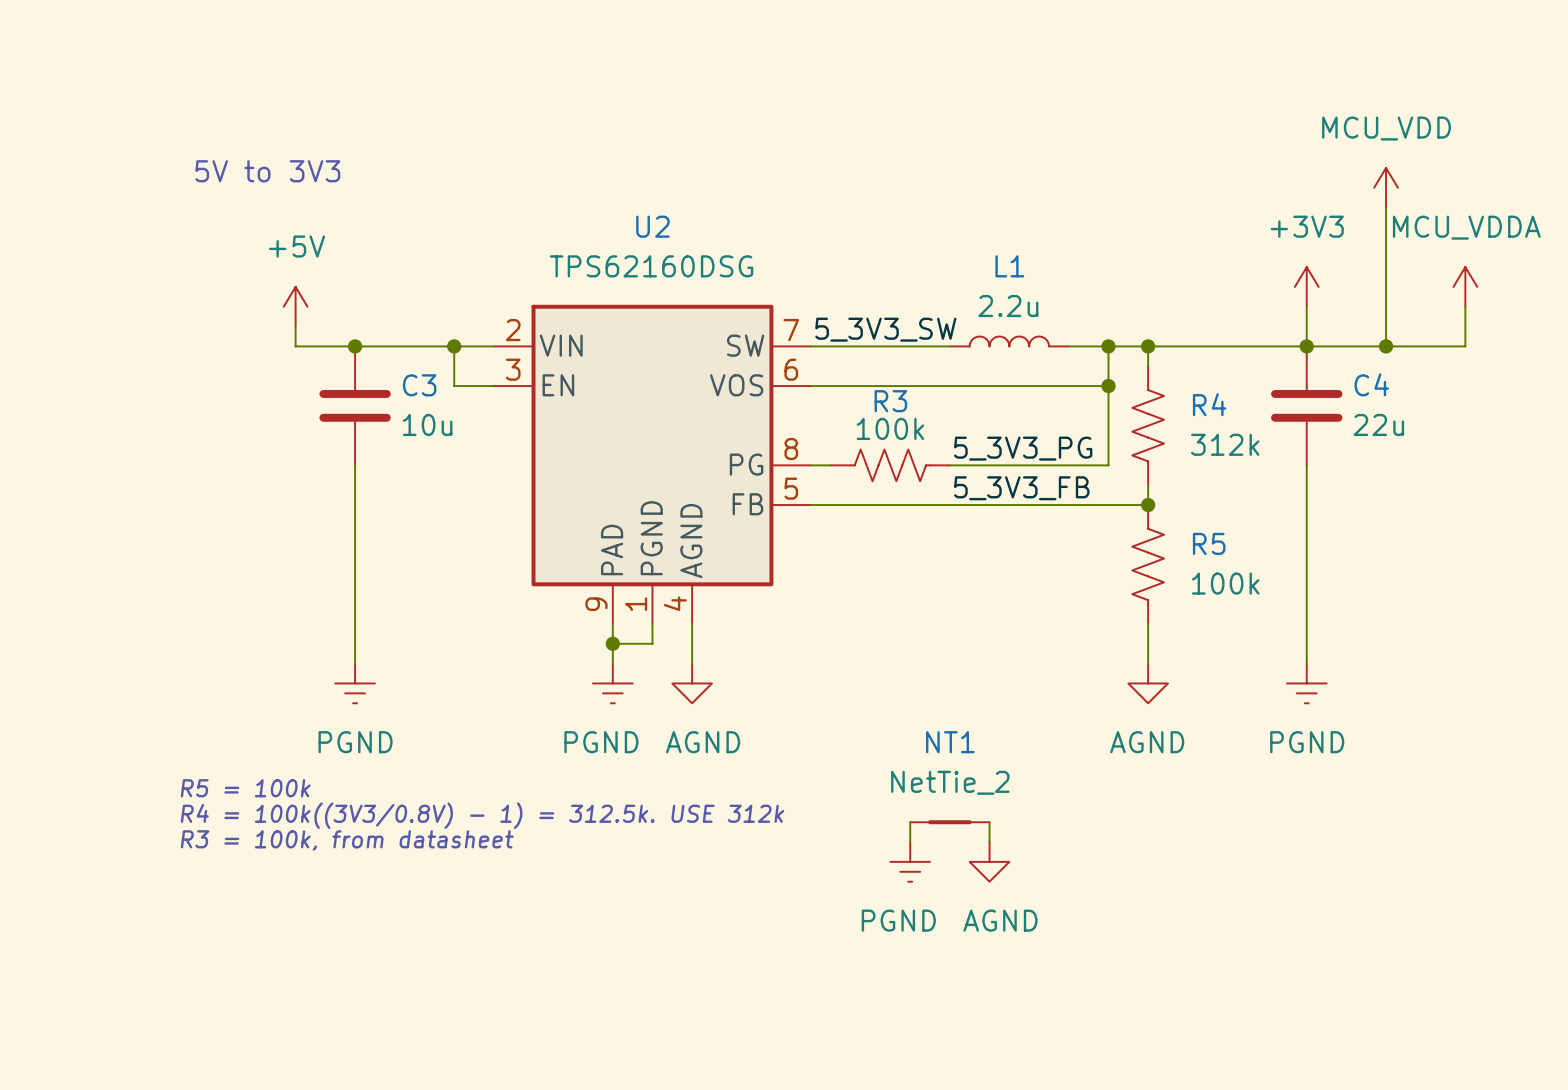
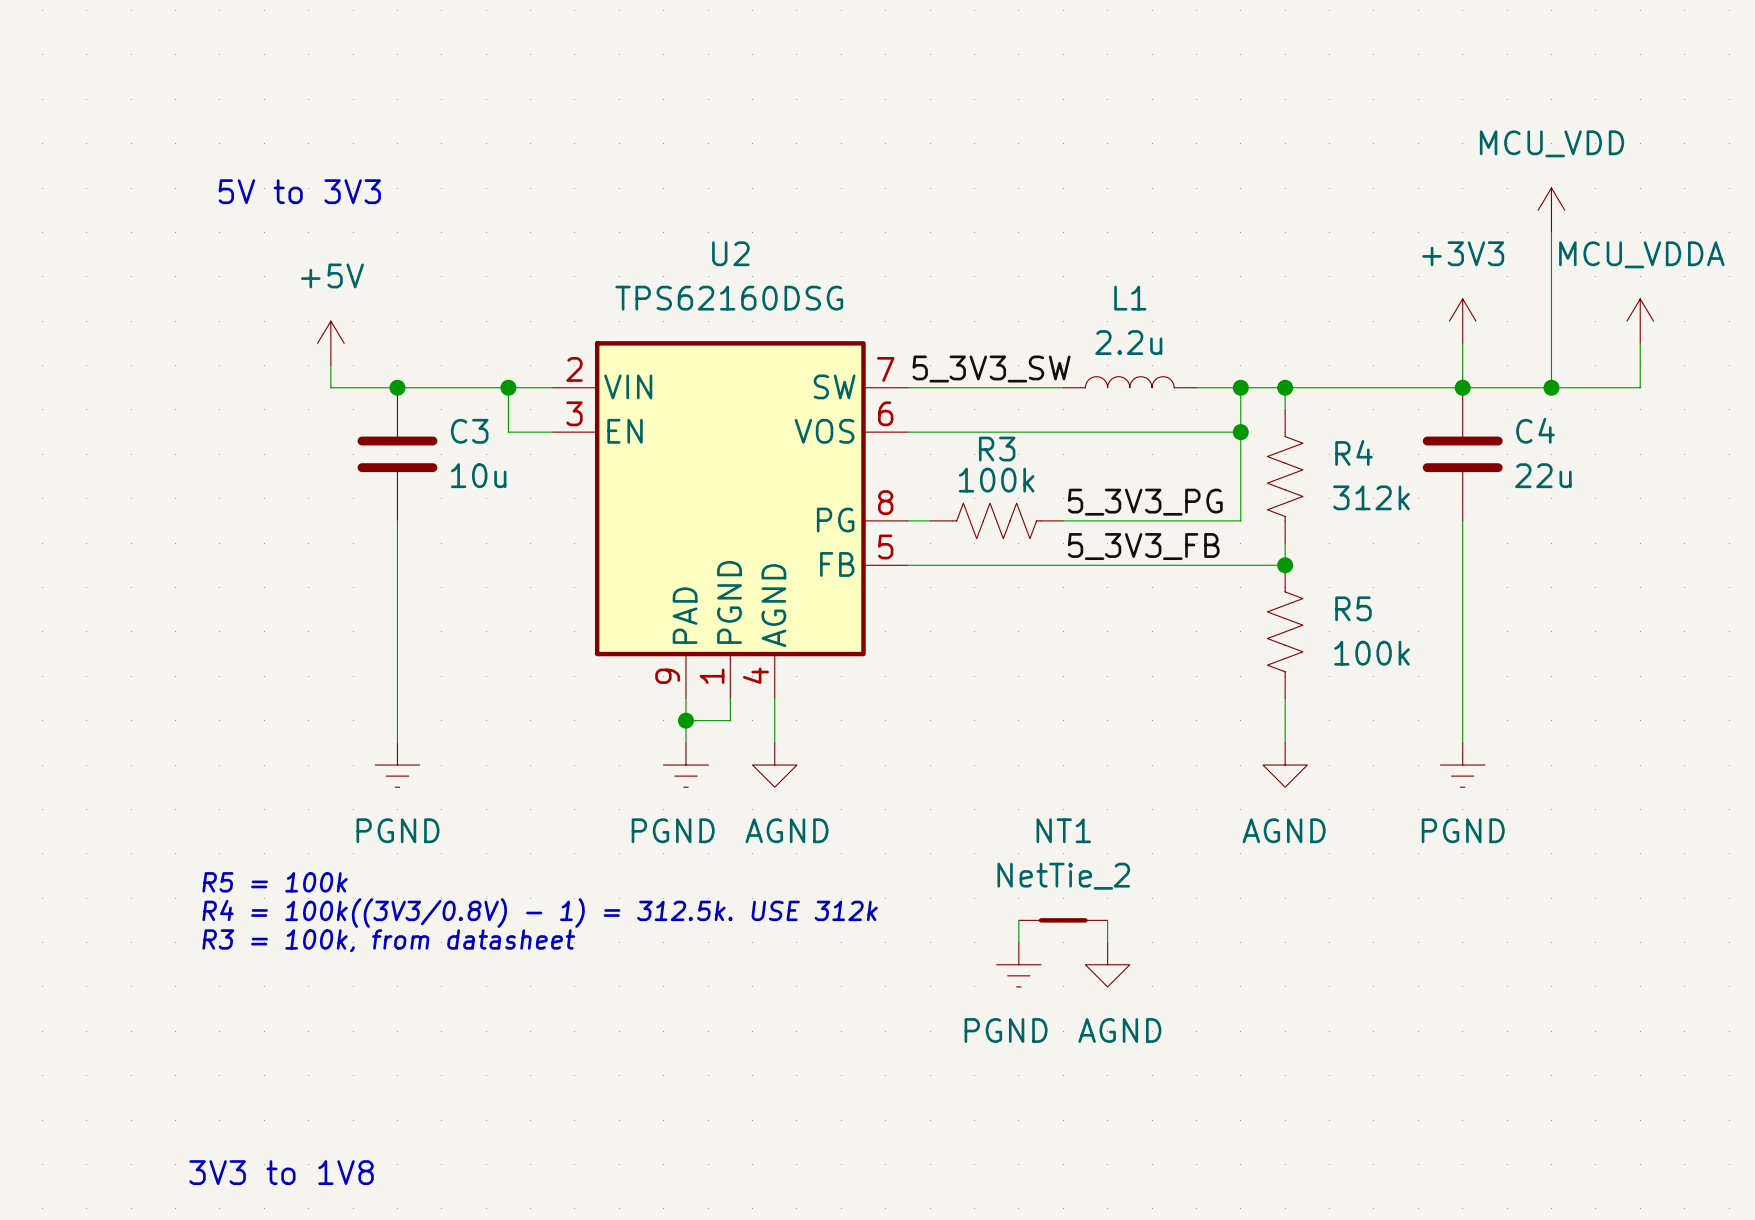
text: none -> 3V3 to 1V8 (281, 1172)

